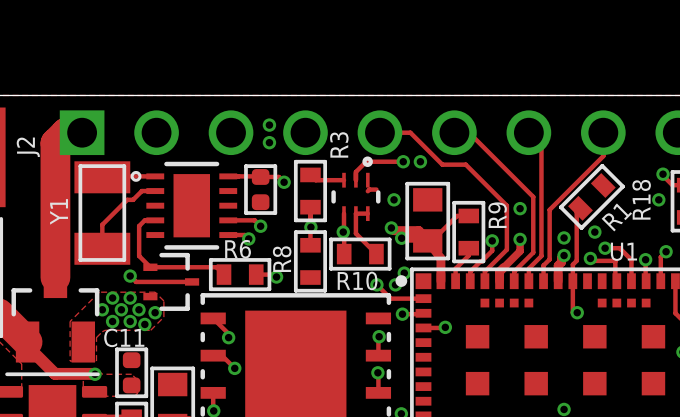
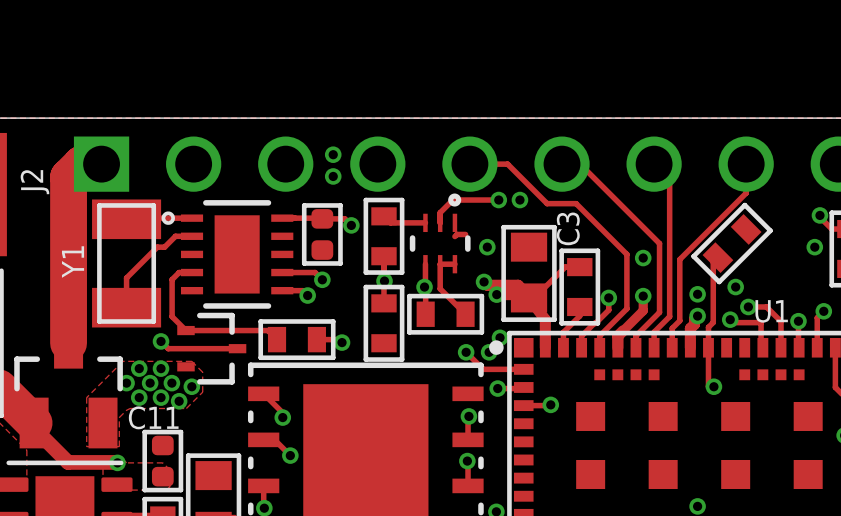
R3 name: R3 (339, 144) -> none
C3 name: none -> C3 (568, 228)
R18 name: R18 (641, 199) -> none
R9 name: R9 (497, 215) -> none
R1 name: R1 (616, 217) -> none
R6 name: R6 (238, 249) -> none
R8 name: R8 (282, 259) -> none
R10 name: R10 (357, 280) -> none

